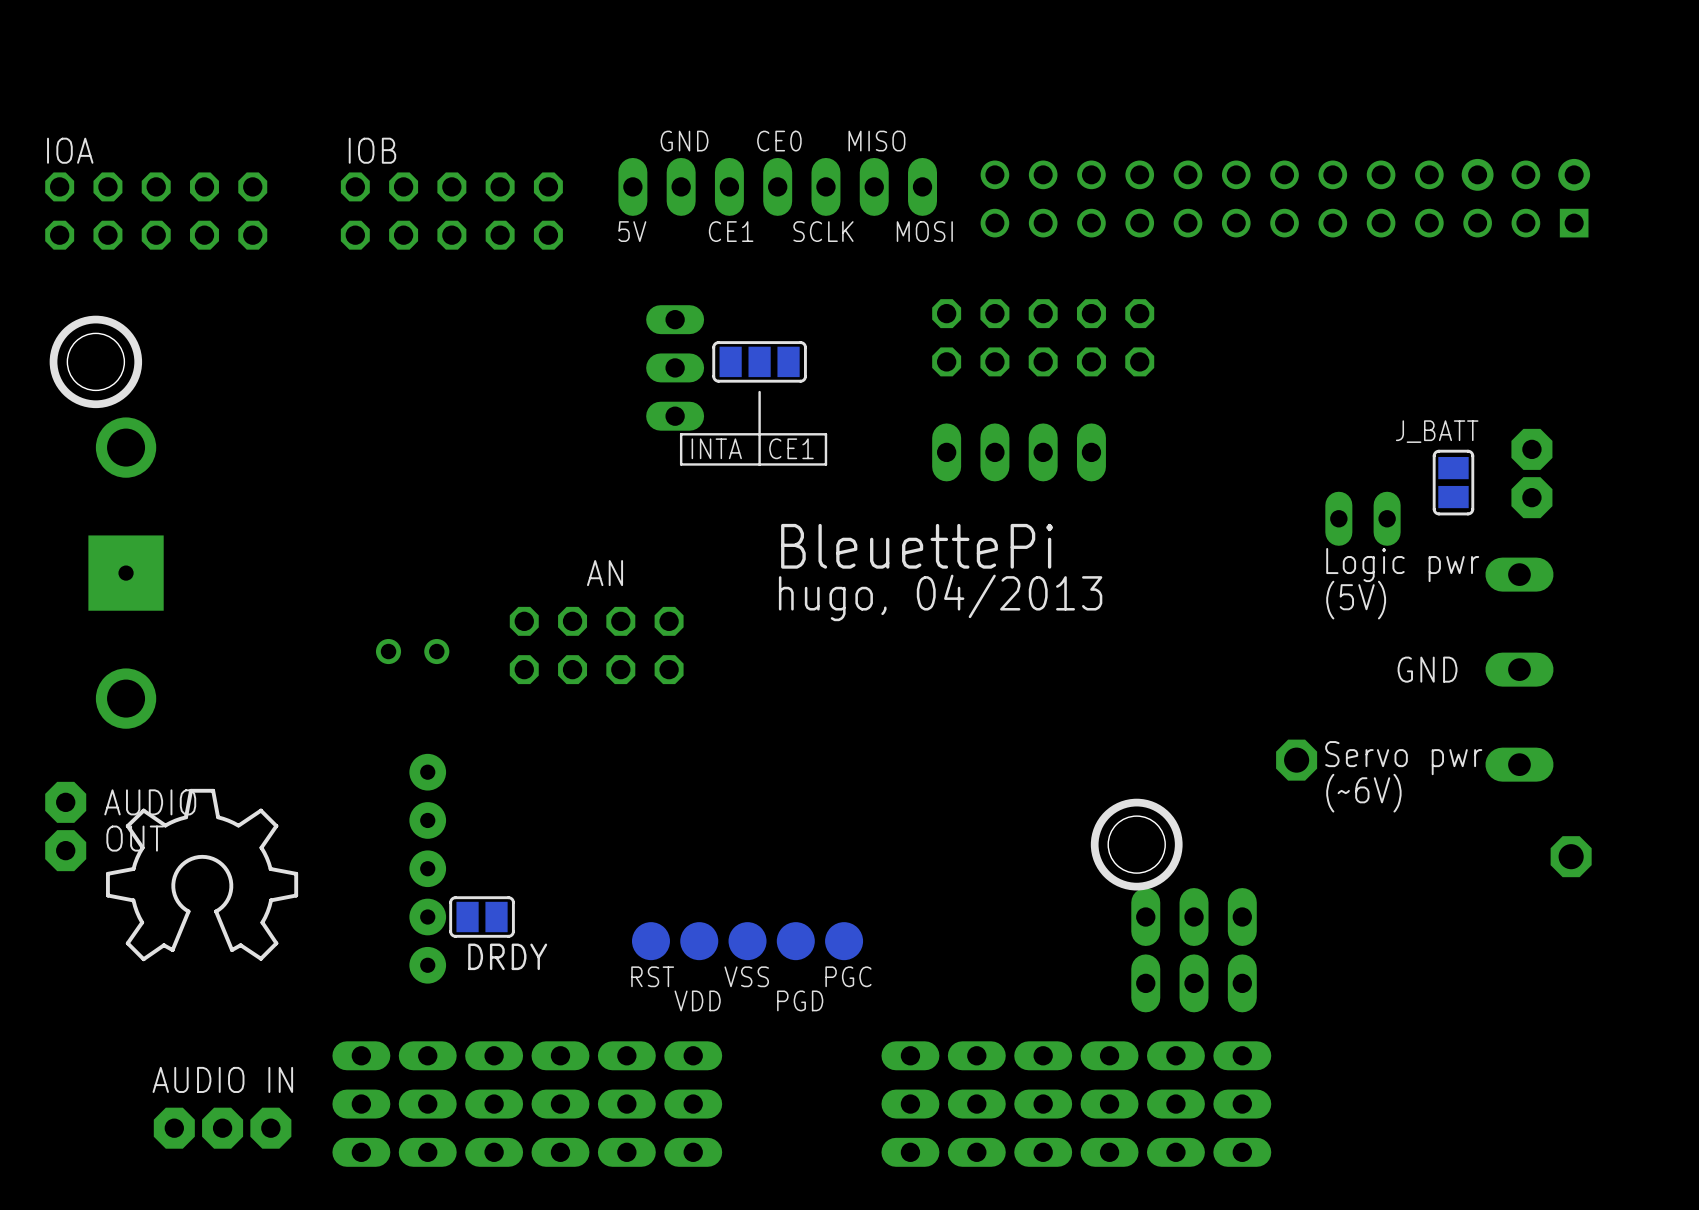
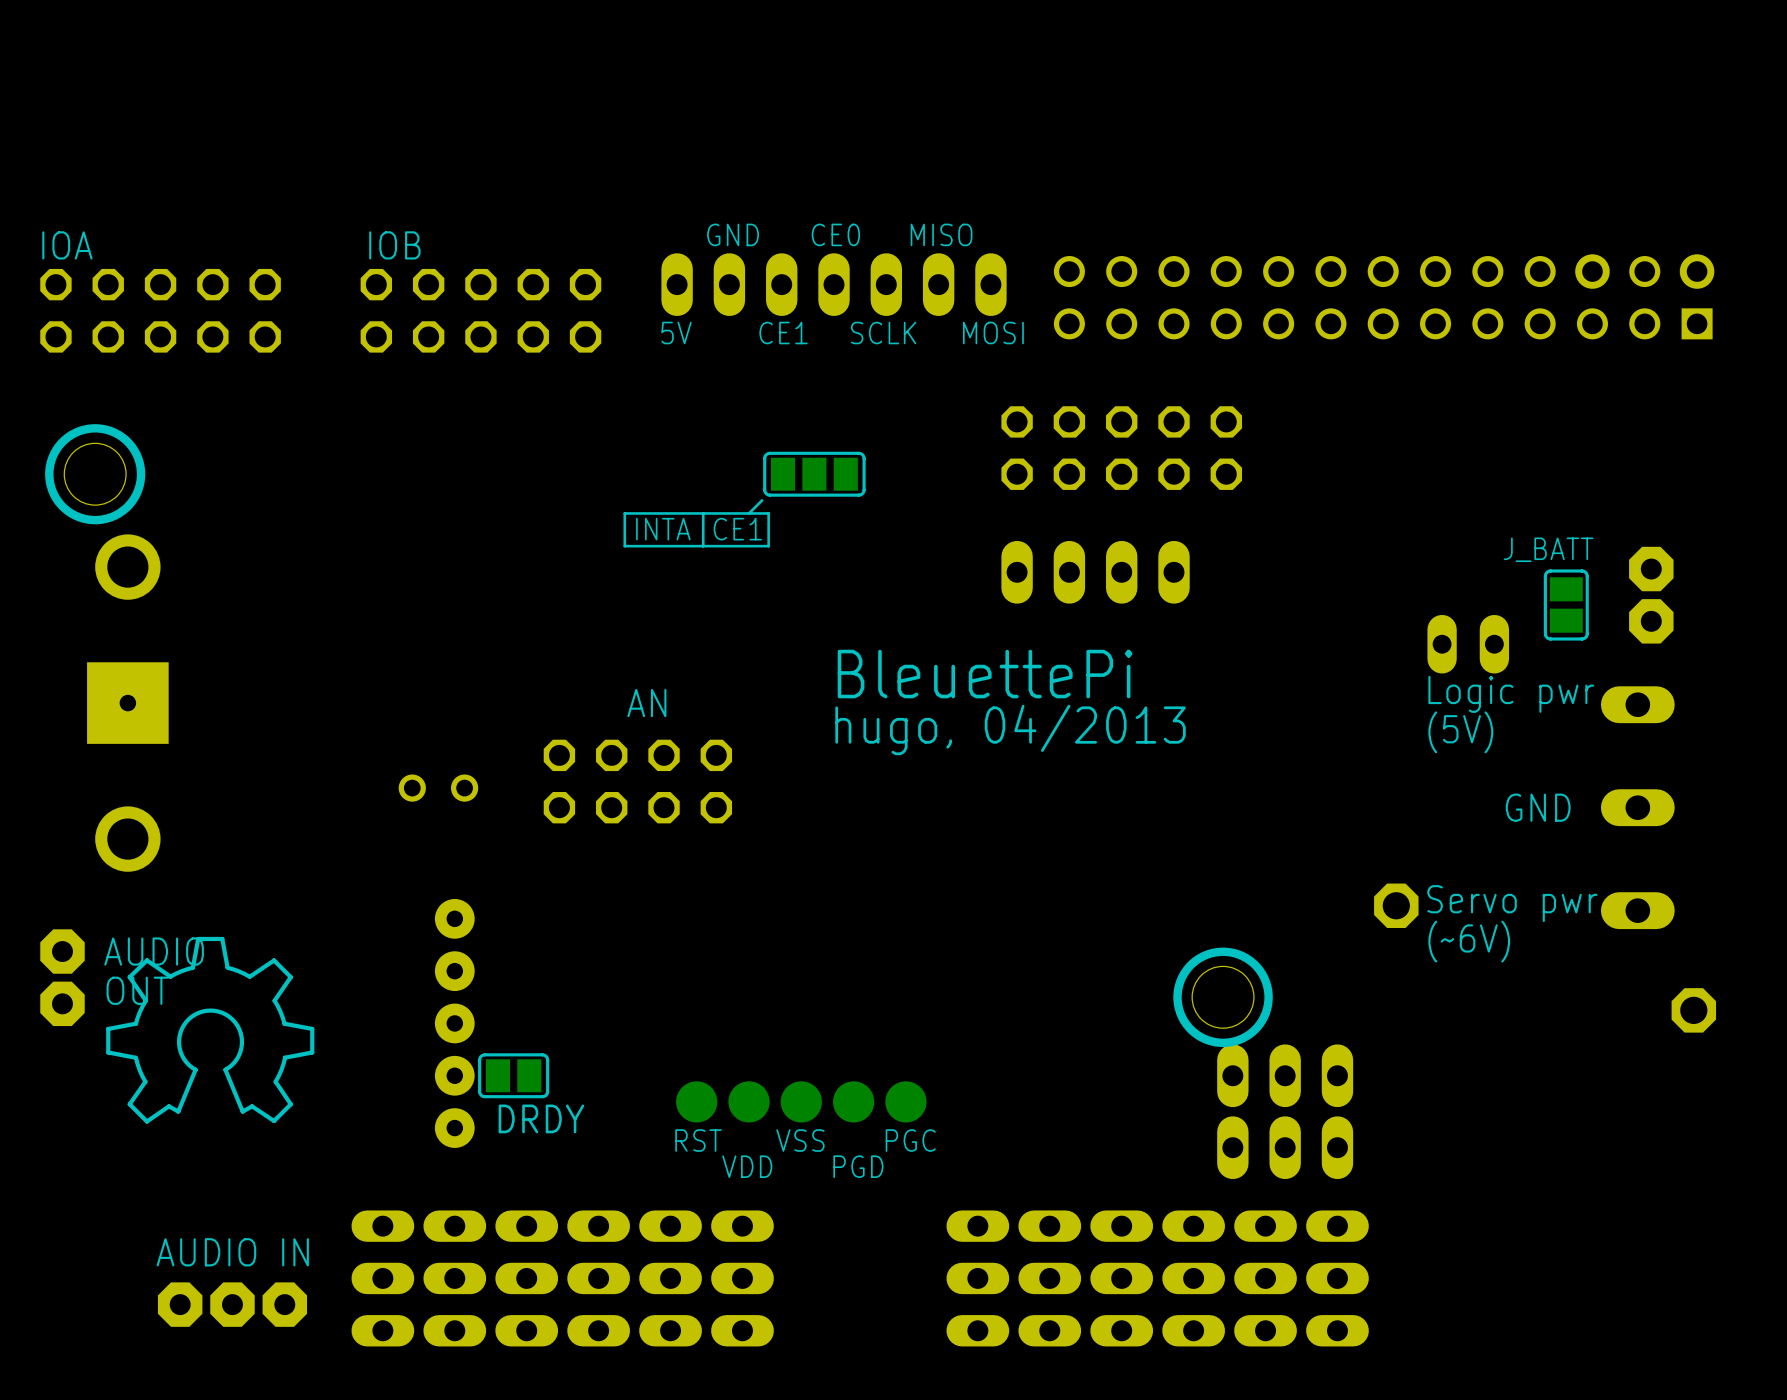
part: (675, 367) -> none
line: none -> (762, 500) (749, 513)
line: (759, 392) (759, 464) -> none
line: none -> (703, 513) (703, 546)
line: none -> (768, 513) (768, 546) (624, 546) (624, 513) (768, 513)
line: (825, 434) (825, 464) (681, 464) (681, 434) (825, 434) -> none
text position: INTA (716, 448) -> INTA (663, 529)
text position: CE1 (791, 448) -> CE1 (737, 529)

